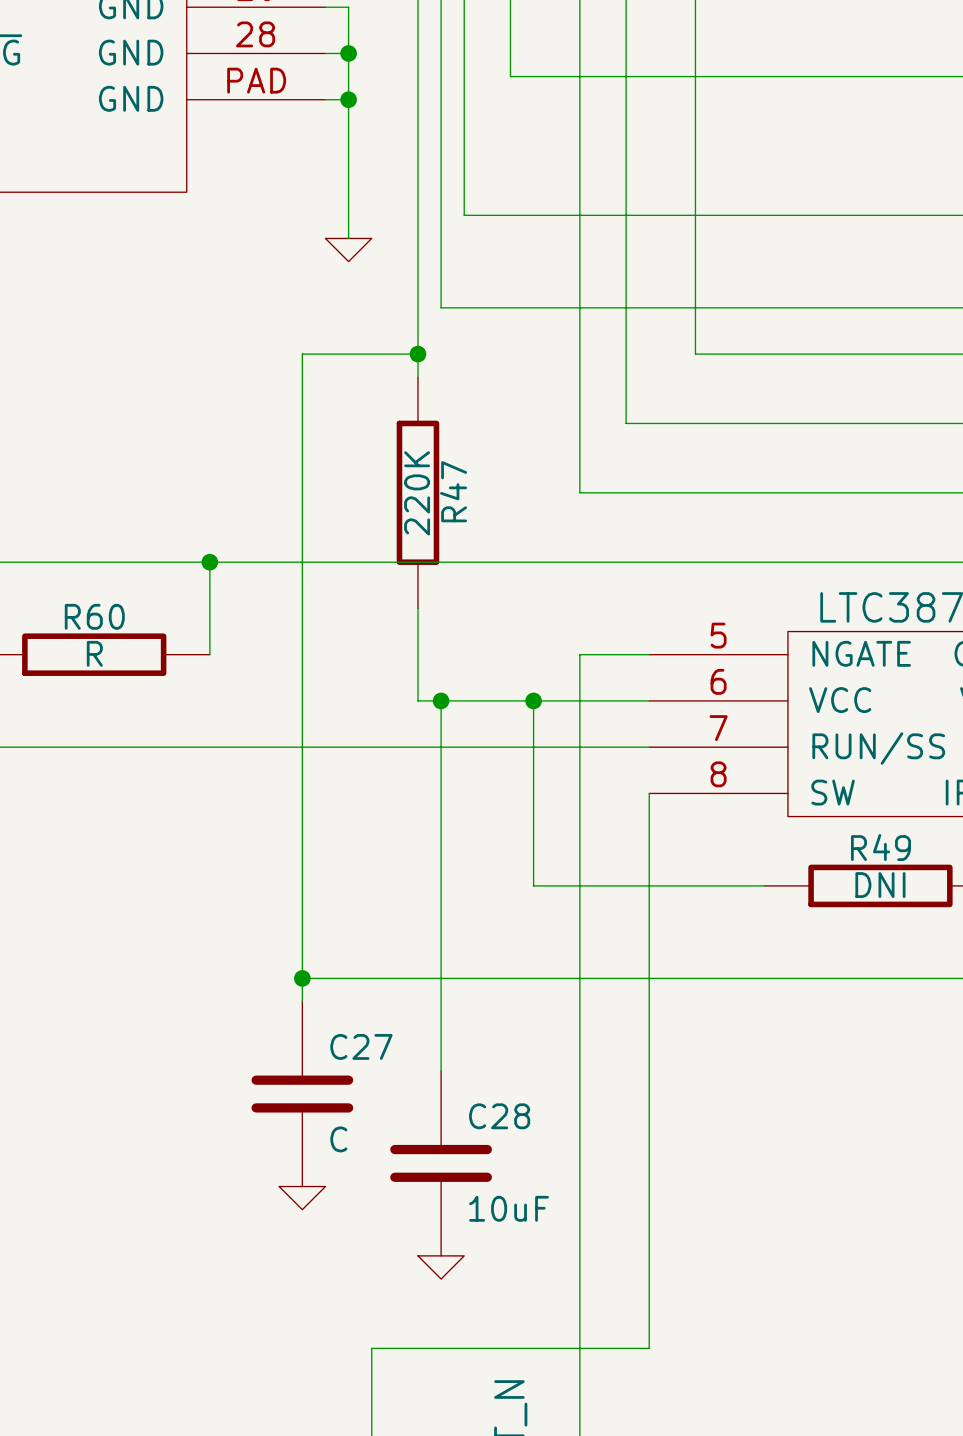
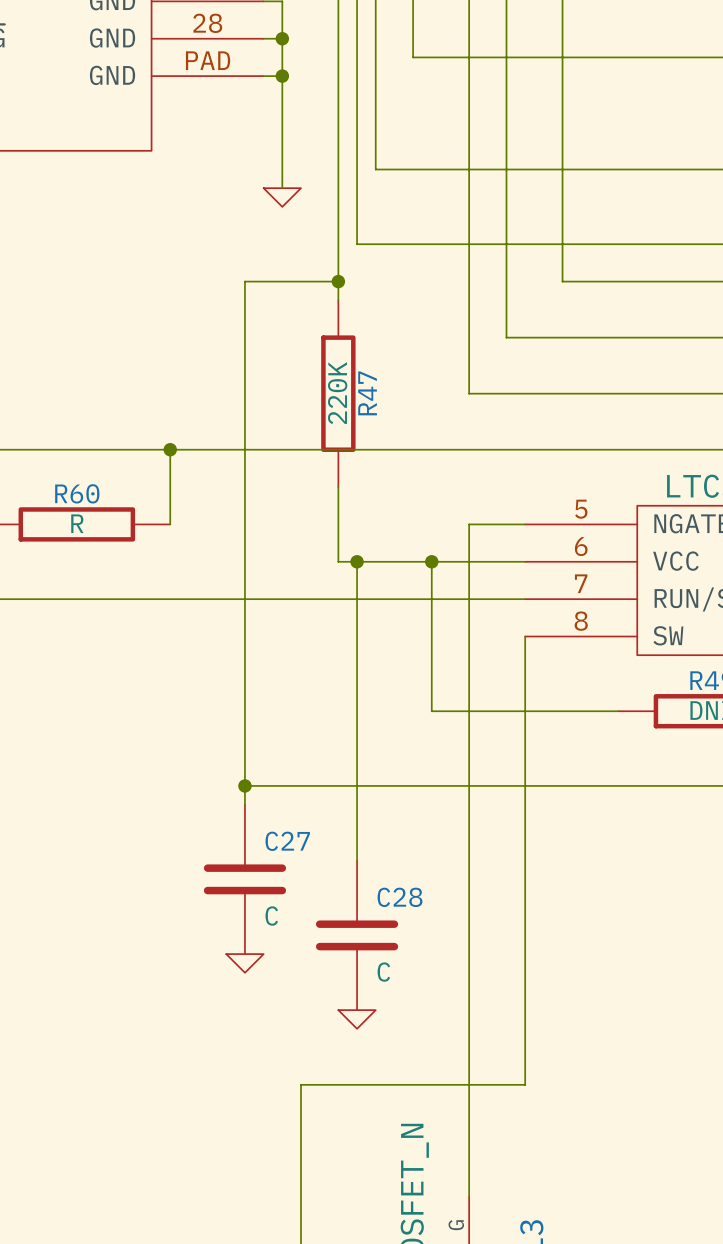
C28 value: 10uF (508, 1208) -> C (383, 972)

